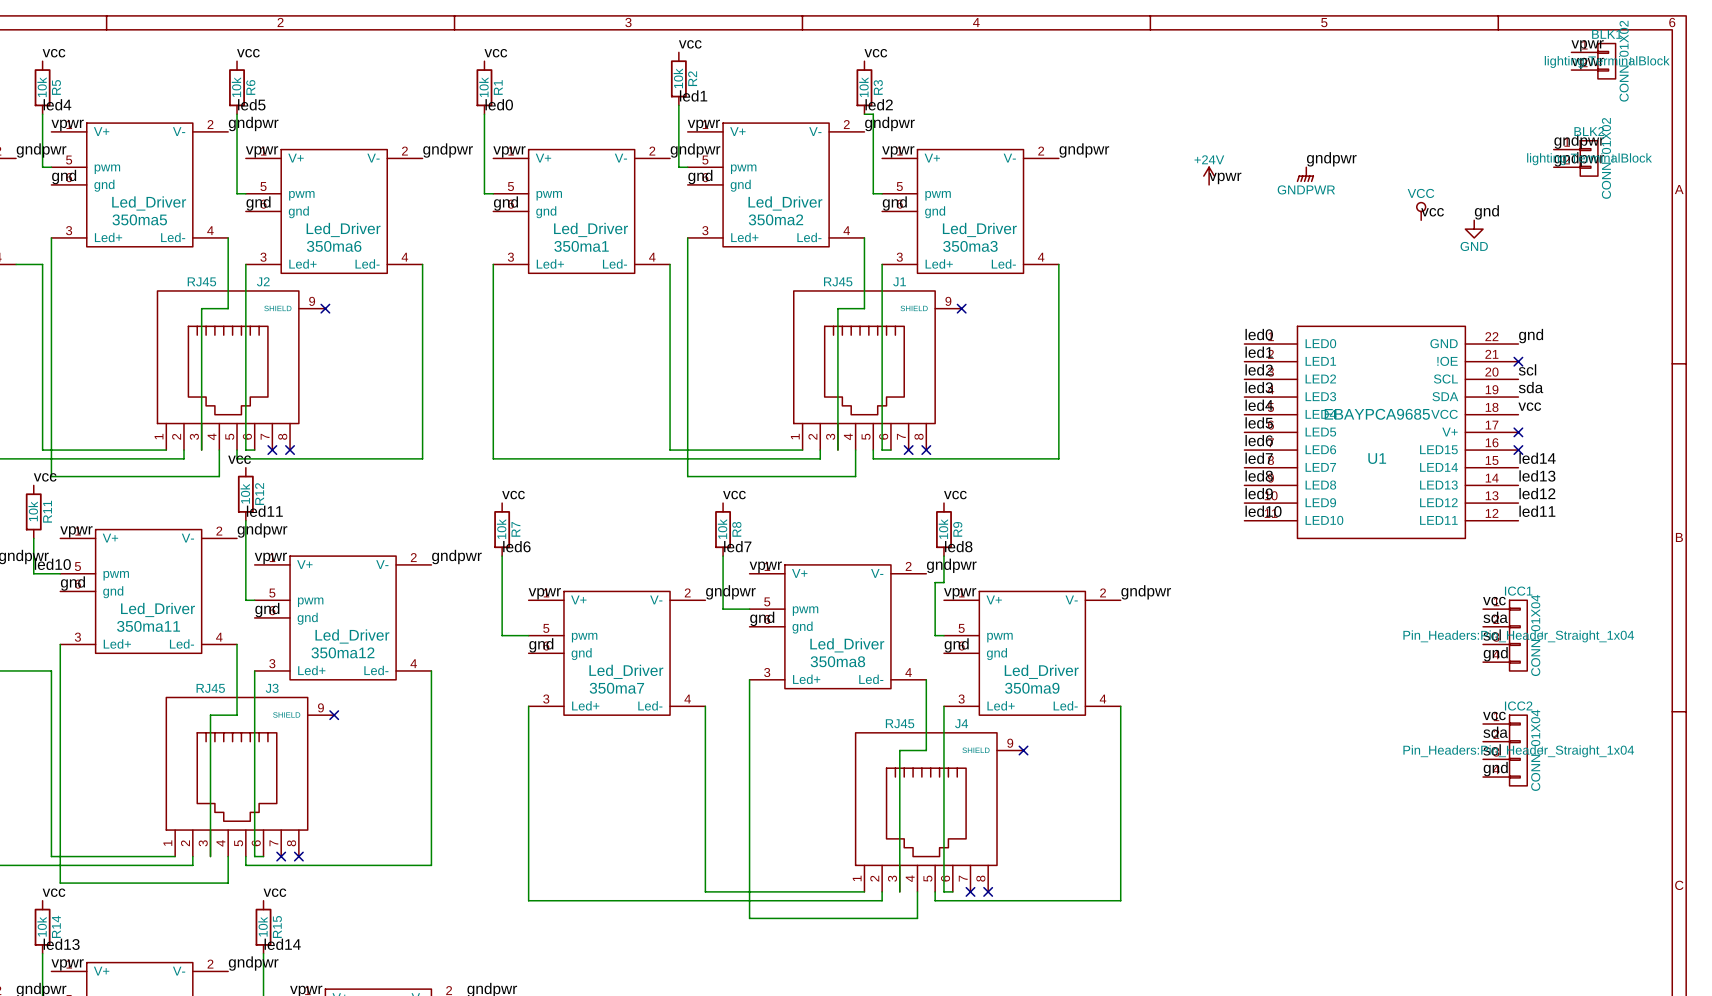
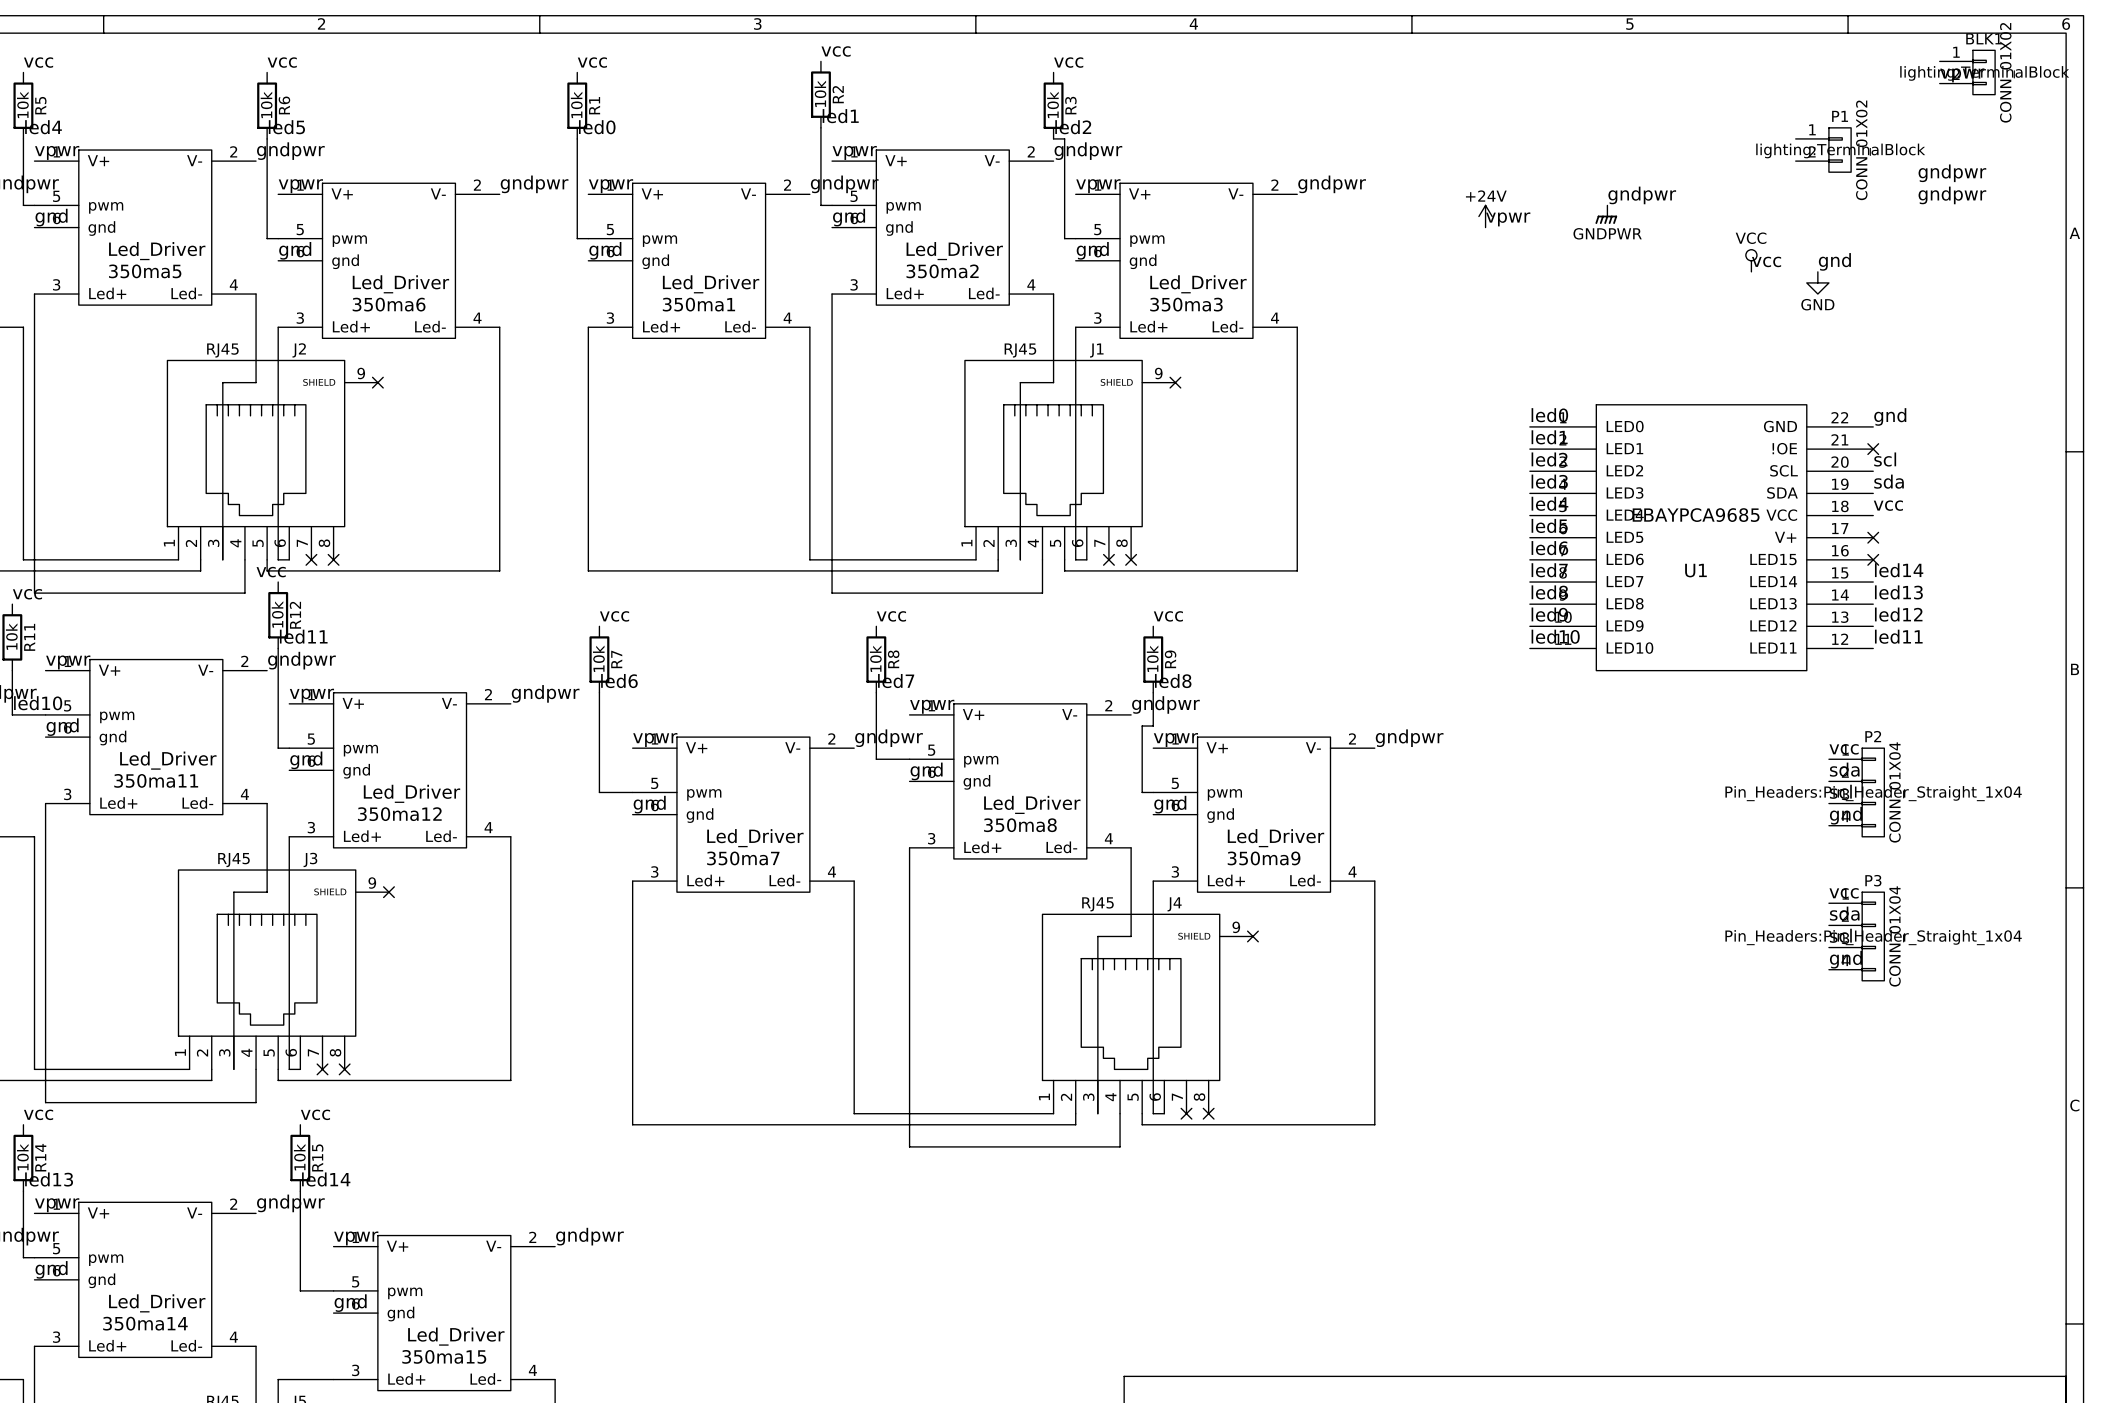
label: vpwr (1587, 45) -> none
P1: none -> CONN_01X02 (1823, 150)
BLK2: CONN_01X02 (1575, 158) -> none
ICC1 name: ICC1 (1518, 591) -> P2 (1873, 736)
ICC2 name: ICC2 (1518, 705) -> P3 (1873, 880)

